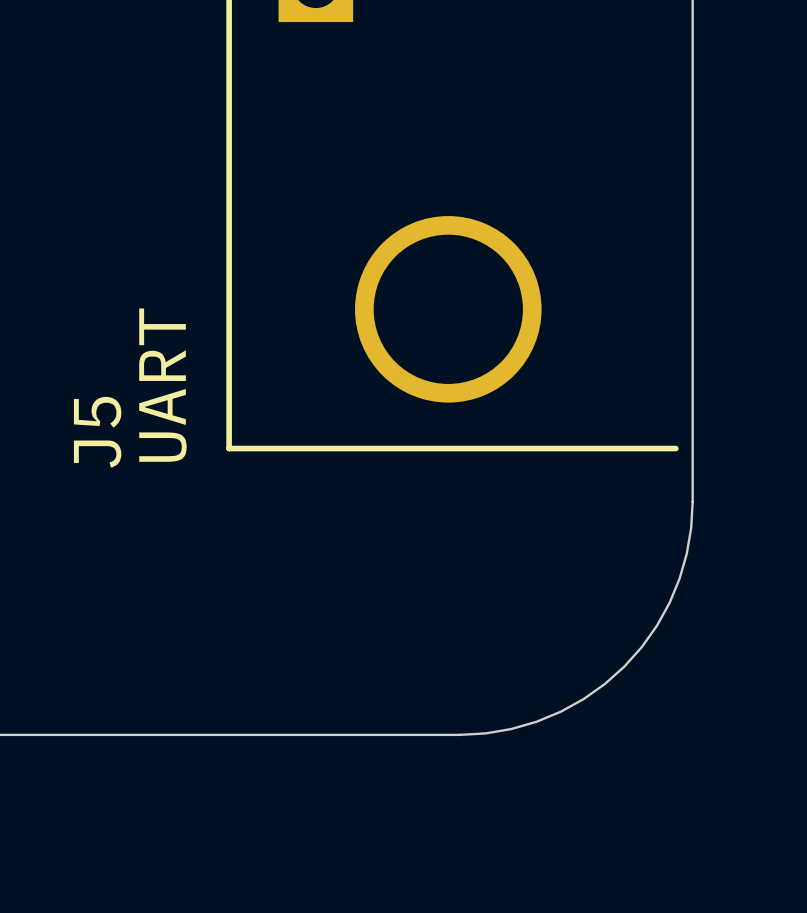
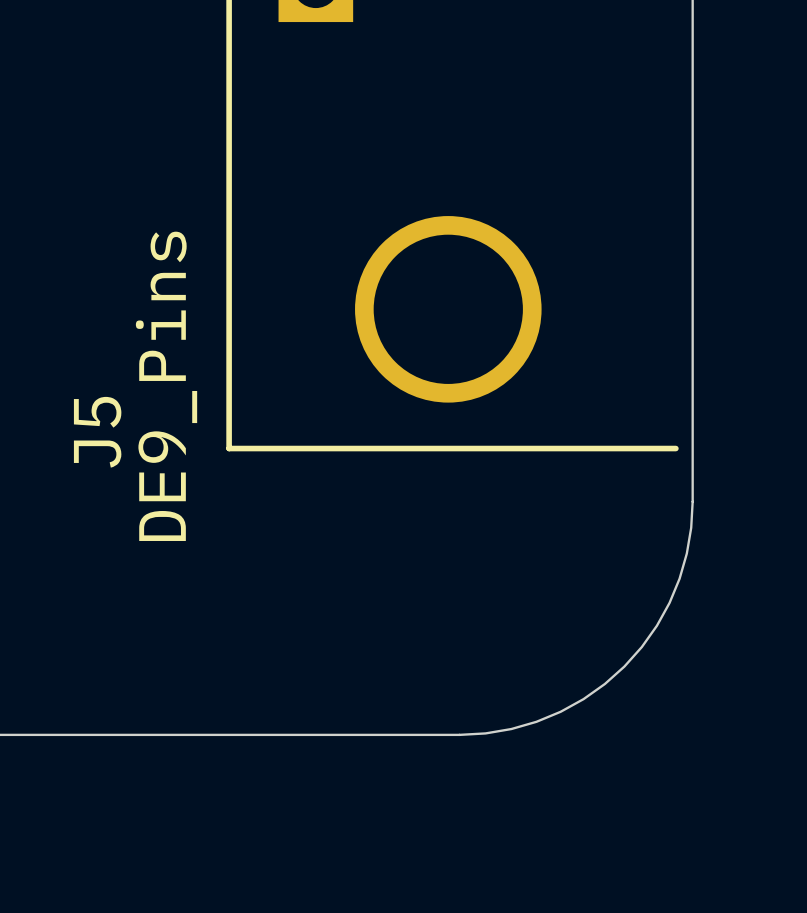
J5 value: UART (162, 385) -> DE9_Pins (166, 386)

